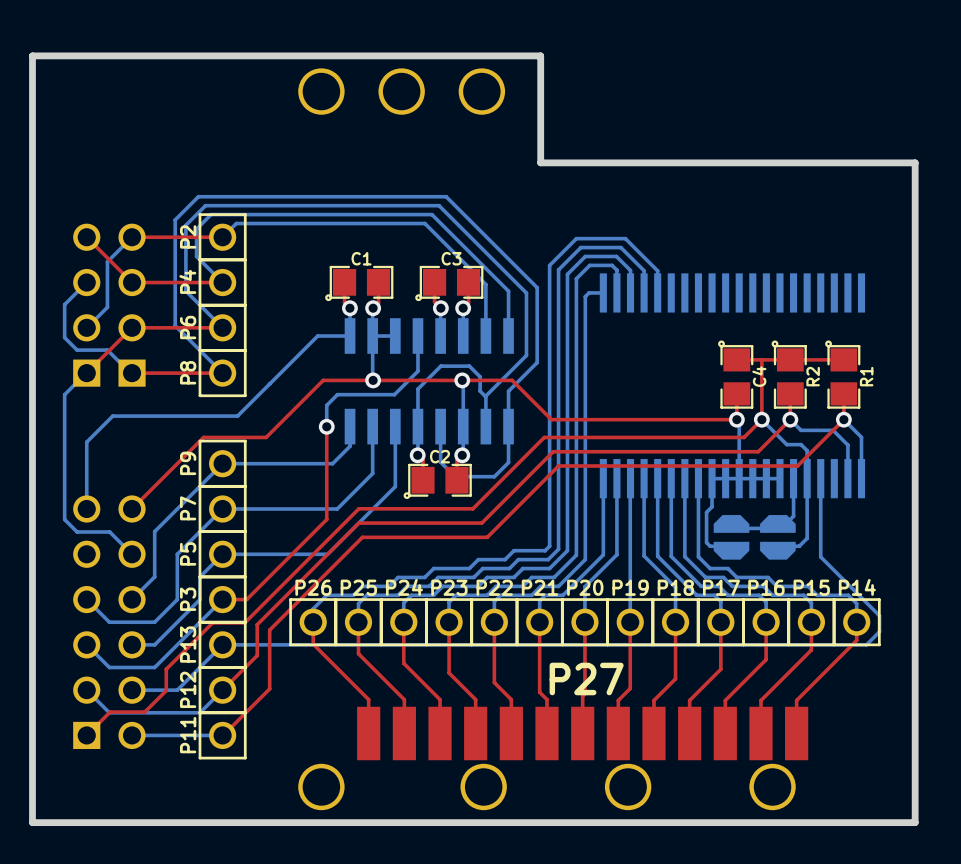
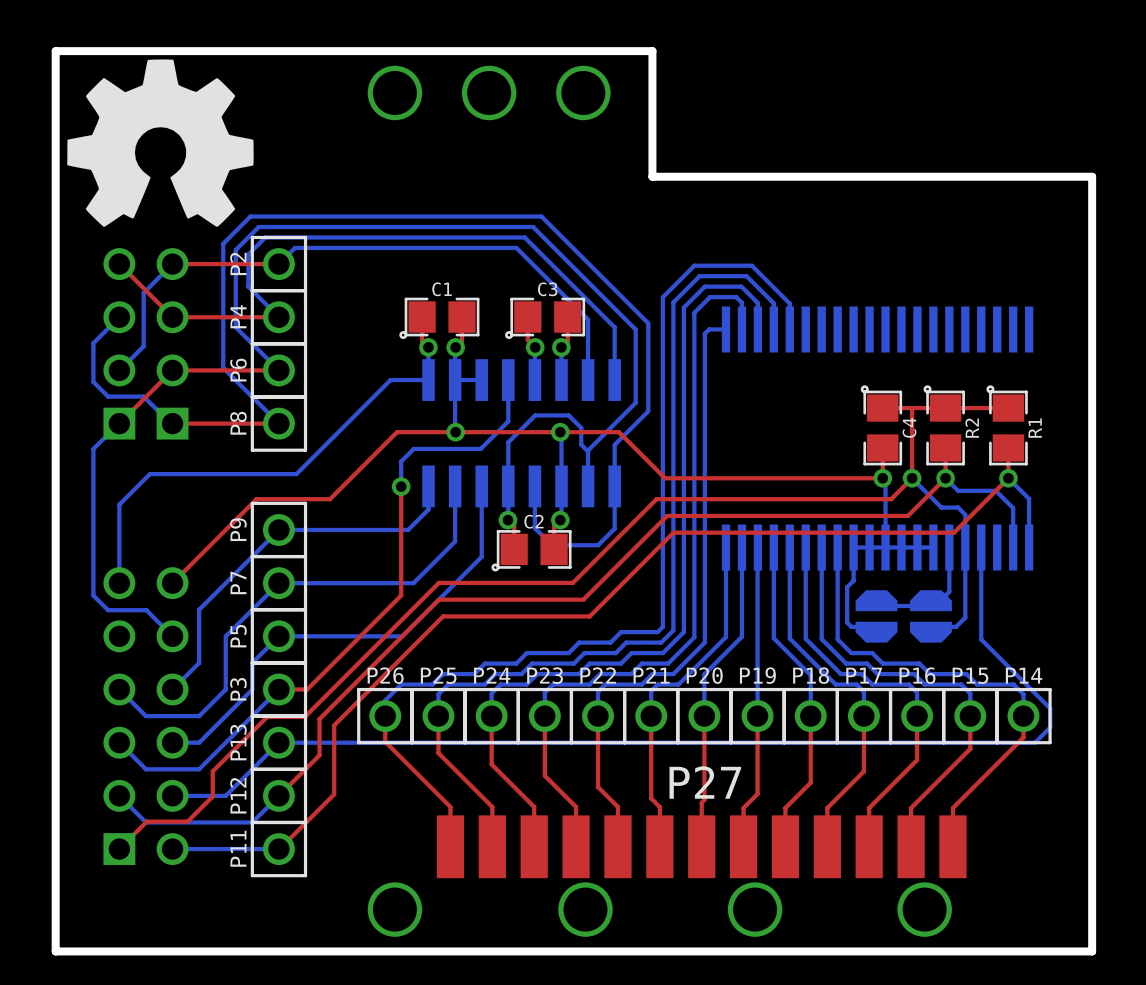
drawing: none -> [67, 59, 254, 227]

